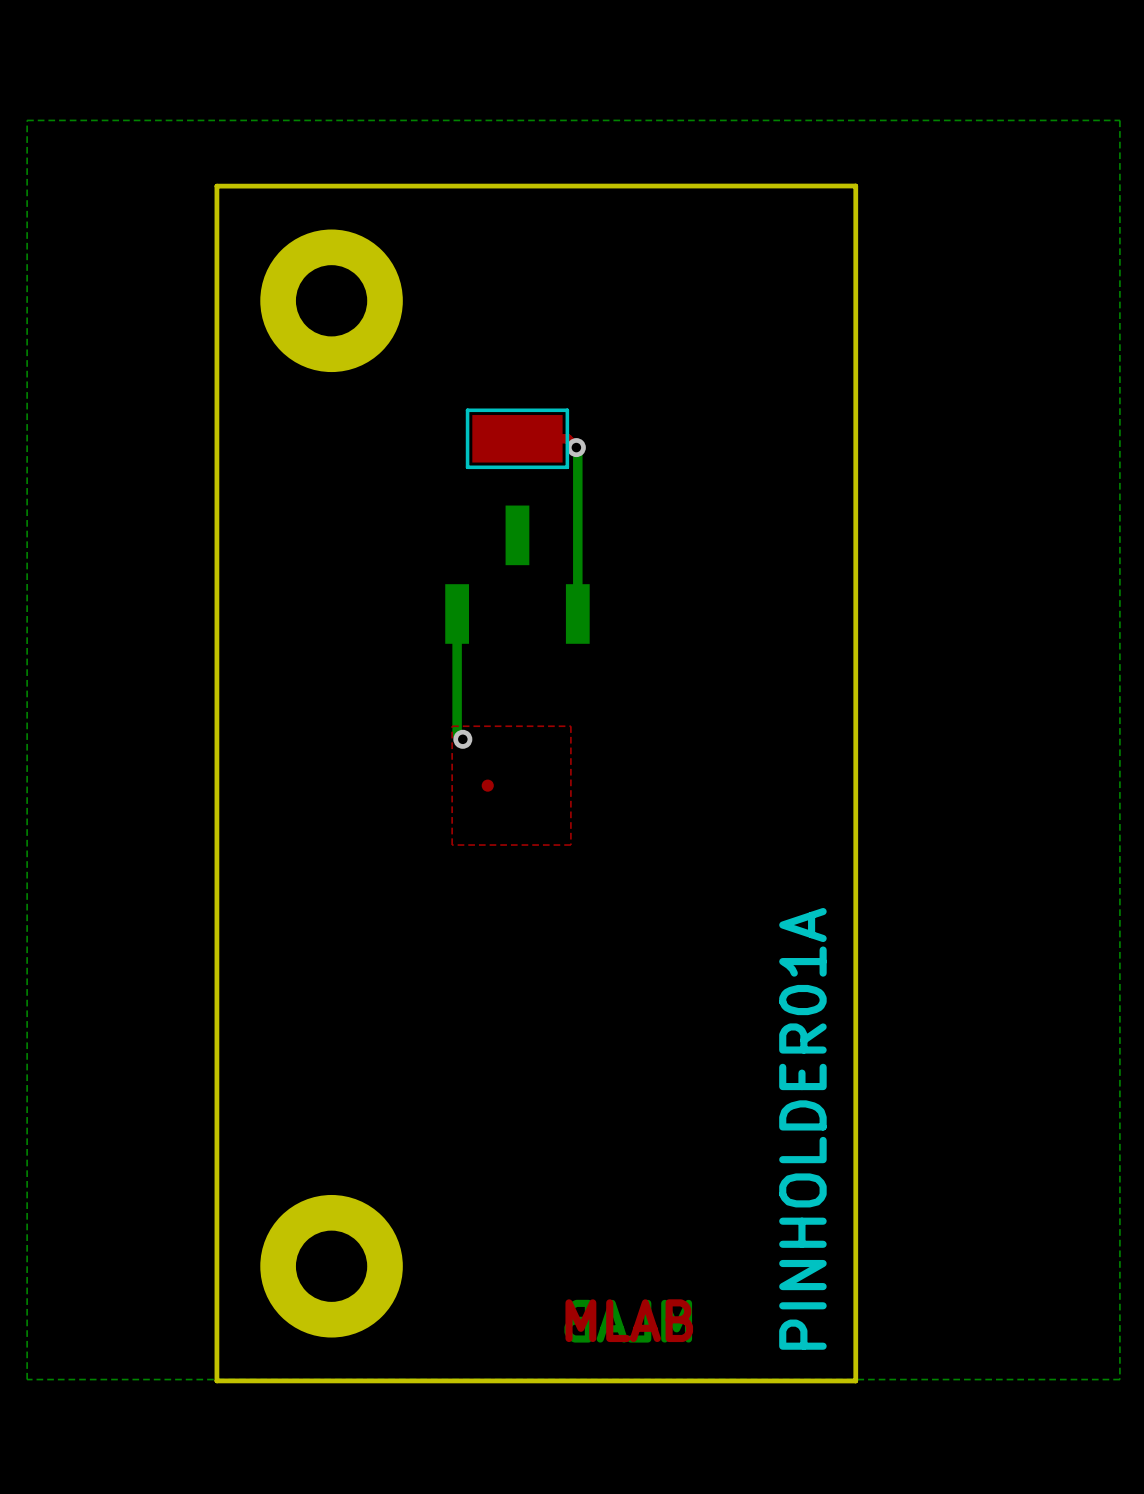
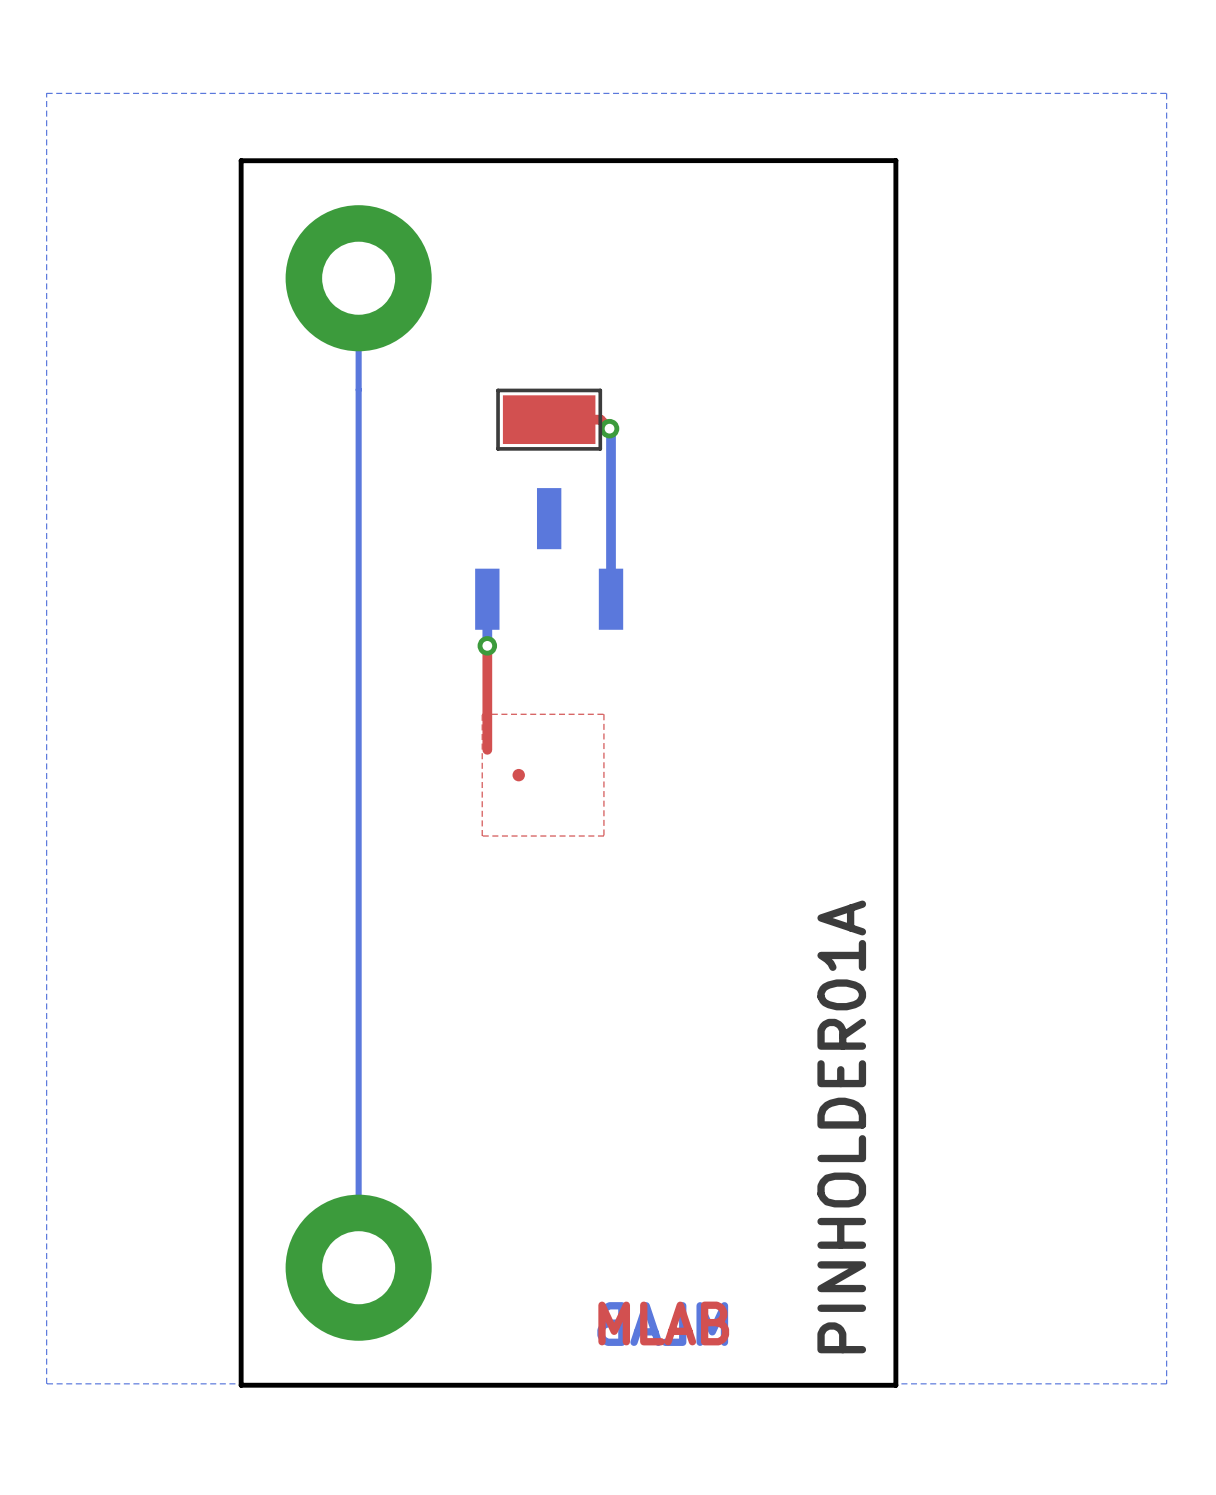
bottom track: none -> (358, 278) (358, 1267)
bottom track: (457, 659) (457, 733) (462, 739) -> none
top track: none -> (487, 645) (487, 749)
via position: (462, 739) -> (487, 645)

